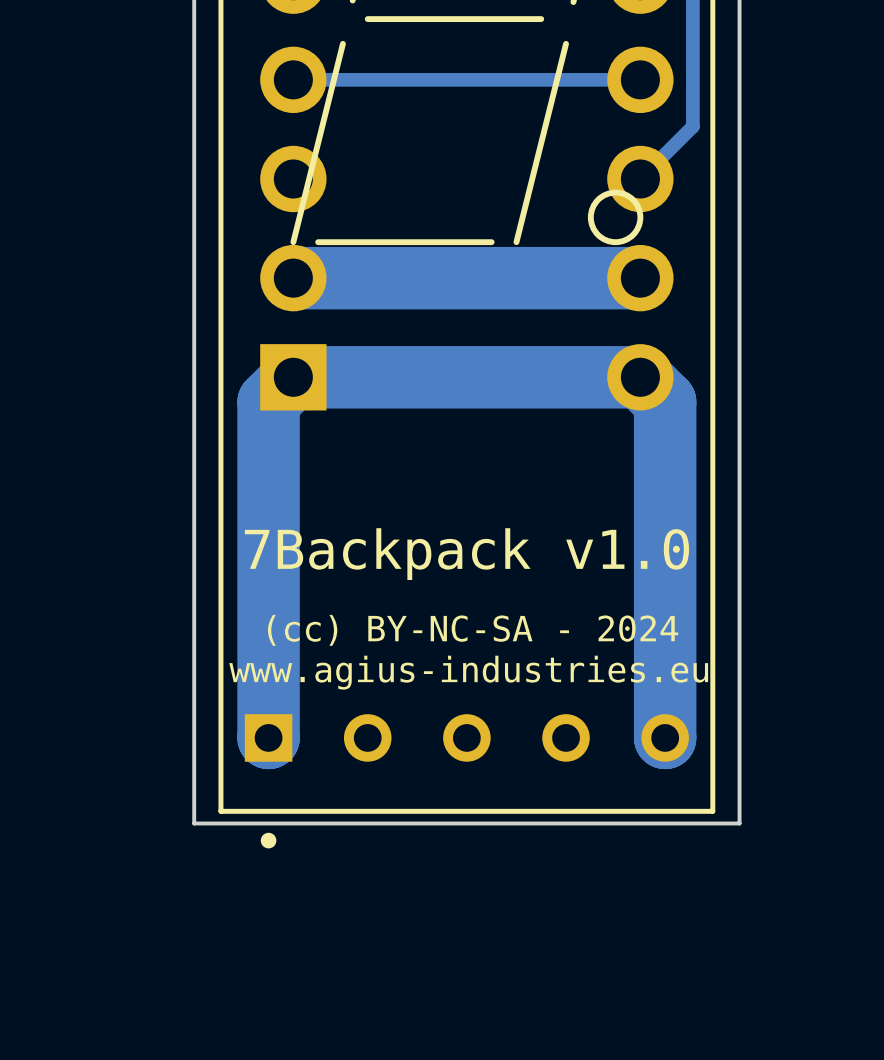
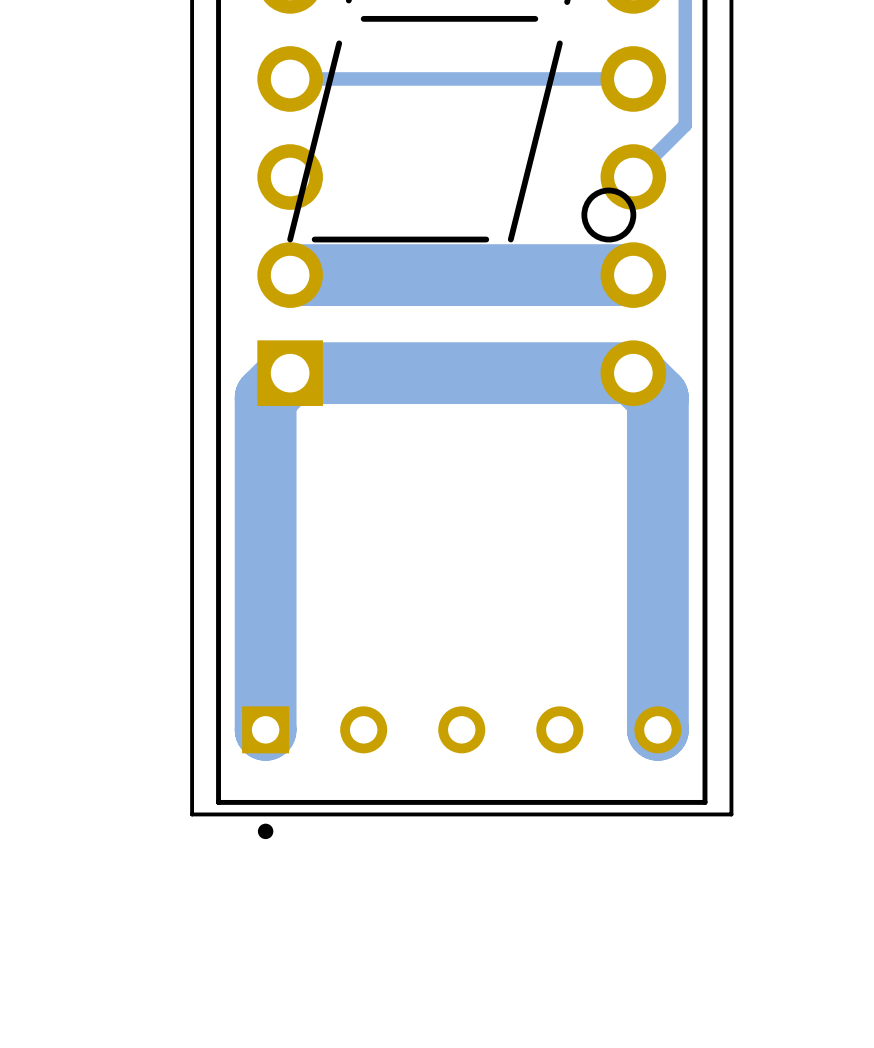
text: 7Backpack v1.0 (466, 554) -> none
text: (cc) BY-NC-SA - 2024 (473, 630) -> none
text: www.agius-industries.eu (468, 672) -> none

